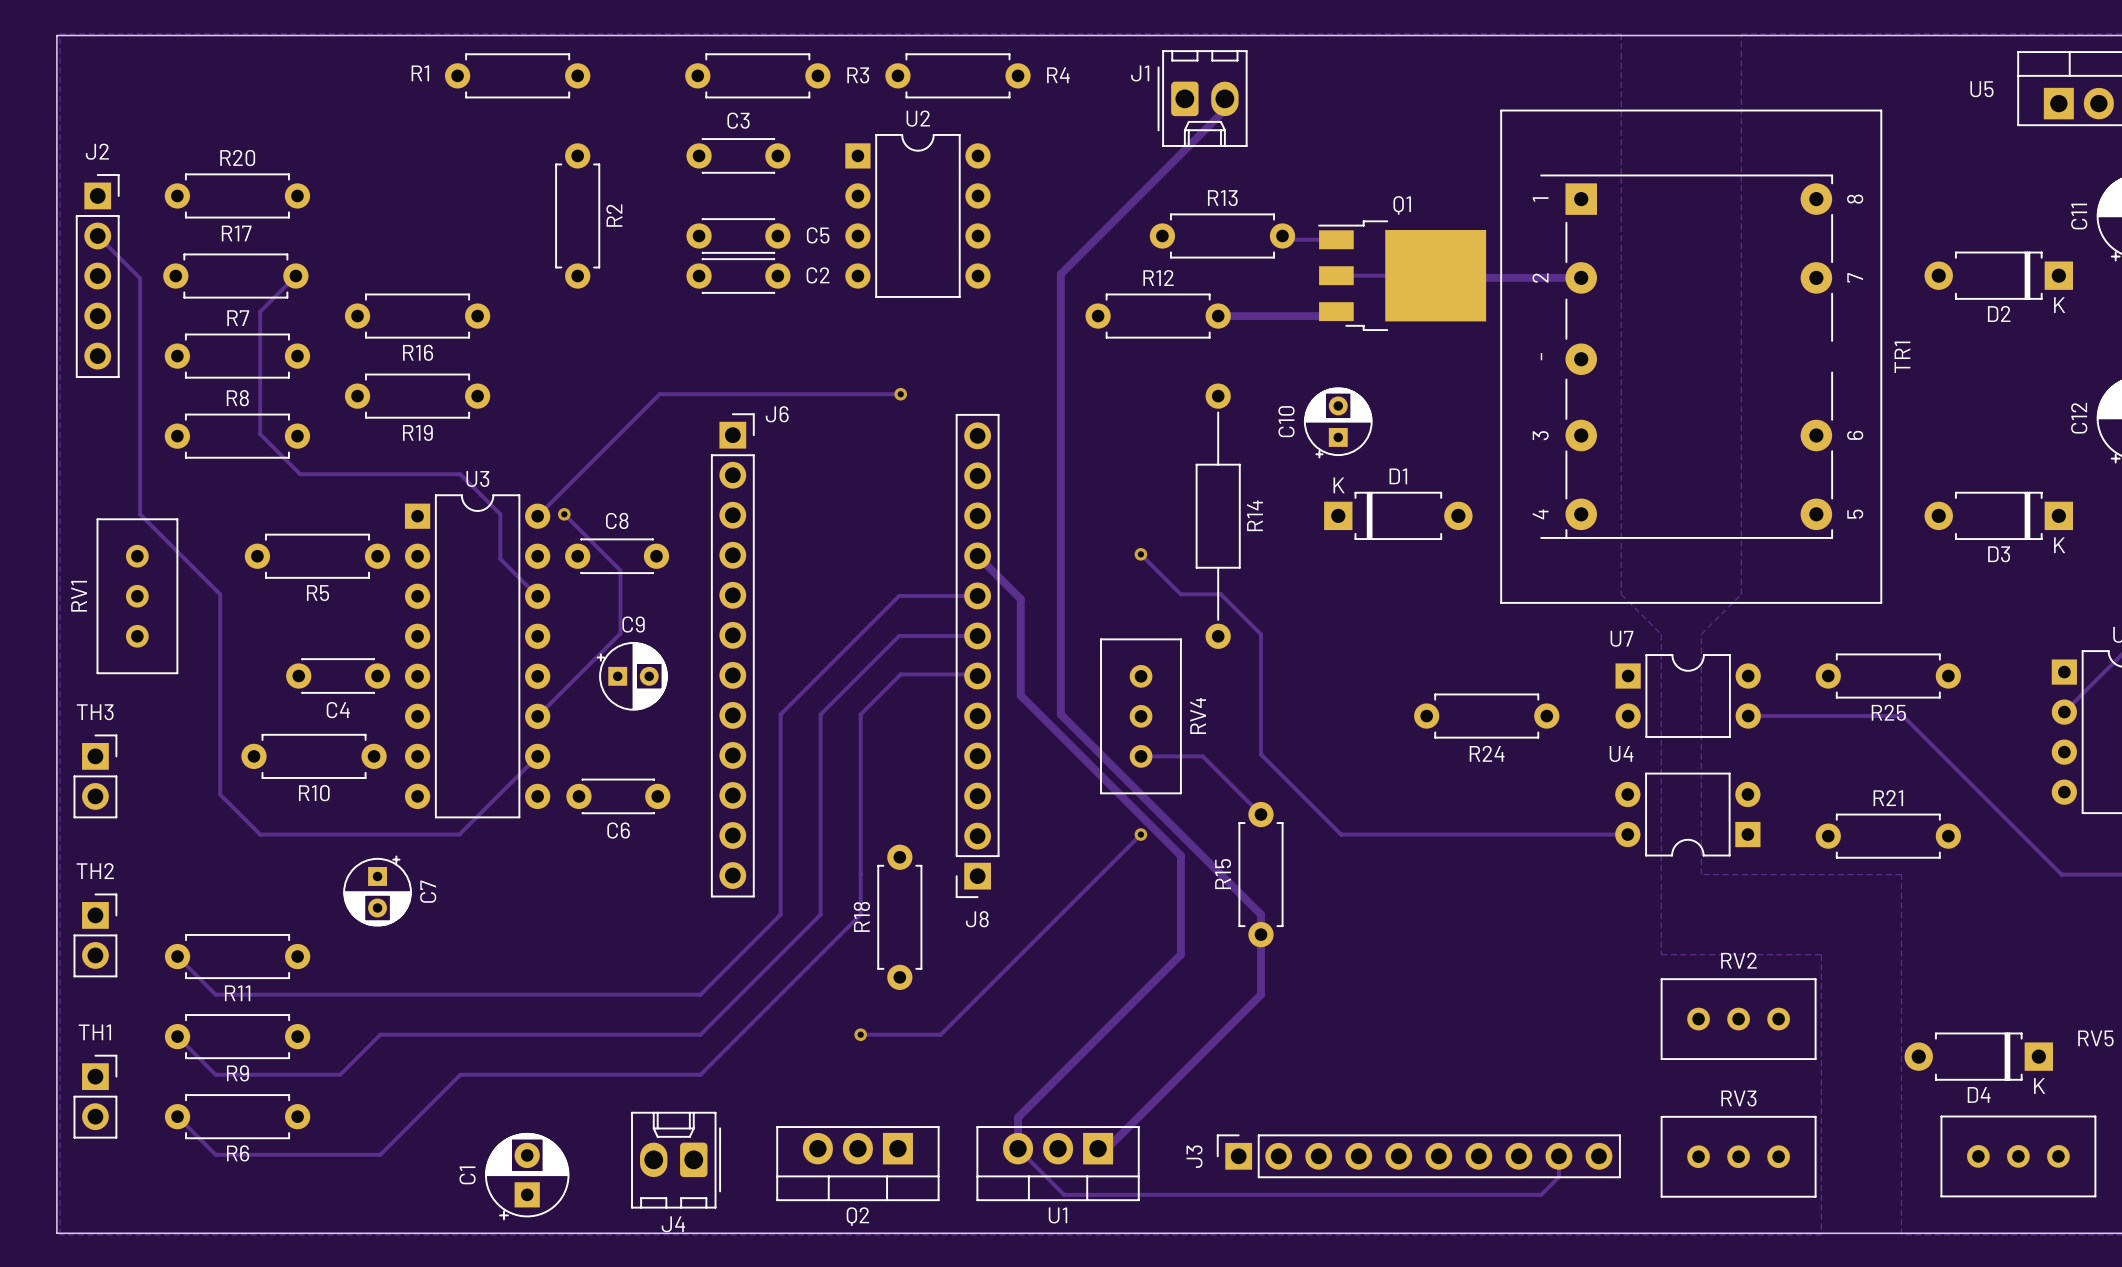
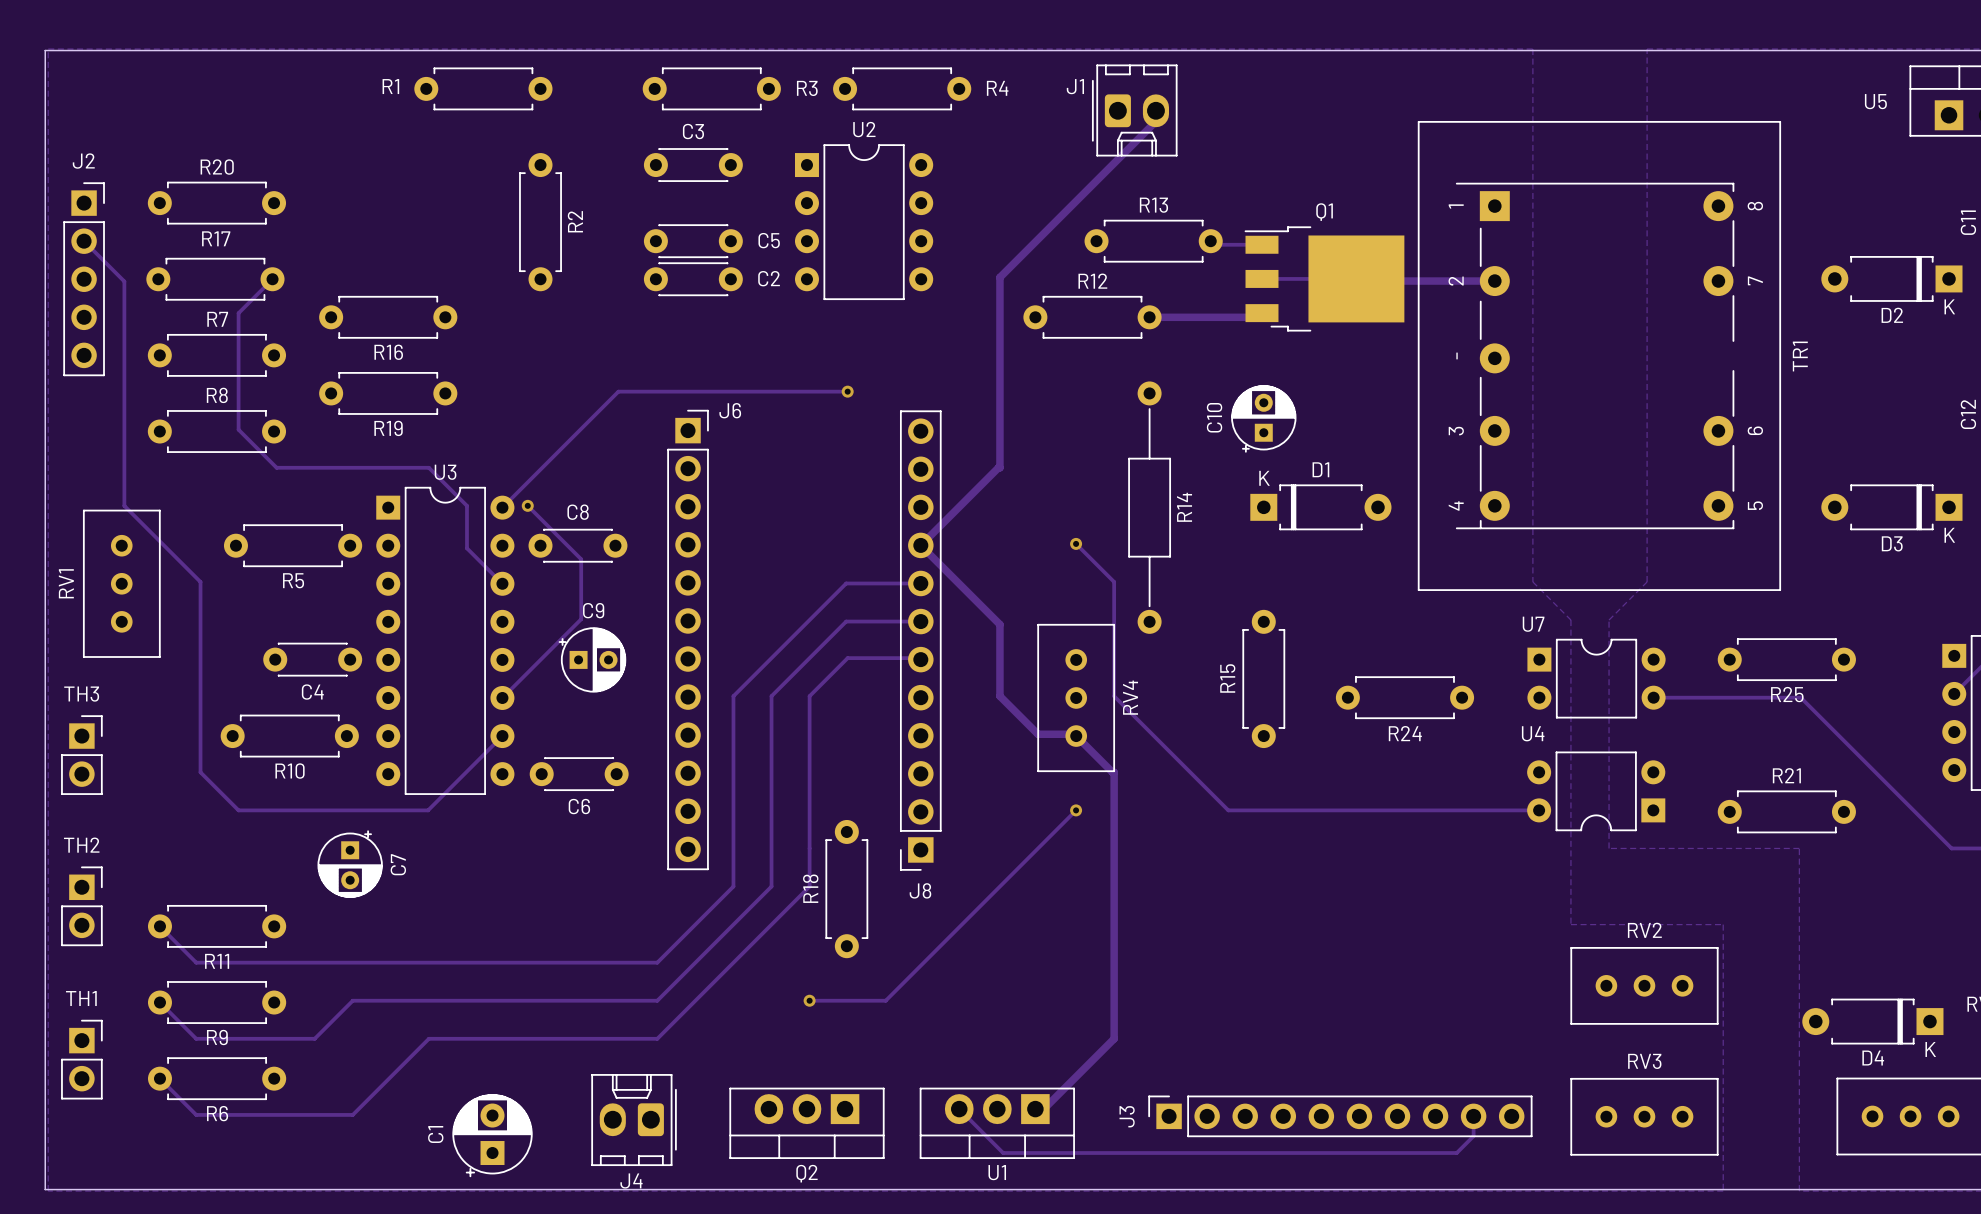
track: (1060, 474) (1060, 639) -> (999, 467) (920, 545)
track: (1180, 594) (1220, 594) (1260, 634) (1260, 754) (1341, 834) -> (1114, 581) (1114, 696) (1228, 810) (1266, 810)
track: (1020, 599) (1020, 695) (1180, 855) -> (961, 586) (999, 624)
track: (1100, 754) (1260, 914) (1260, 994) (1180, 1074) -> (1038, 734) (1076, 734)
track: (1141, 756) (1202, 756) (1260, 814) -> (1076, 736) (1114, 772) (1114, 830)
R15 position: (1260, 874) -> (1263, 678)
track: (1180, 954) (1018, 1117) (1018, 1148) -> (1114, 924) (1114, 1038)

